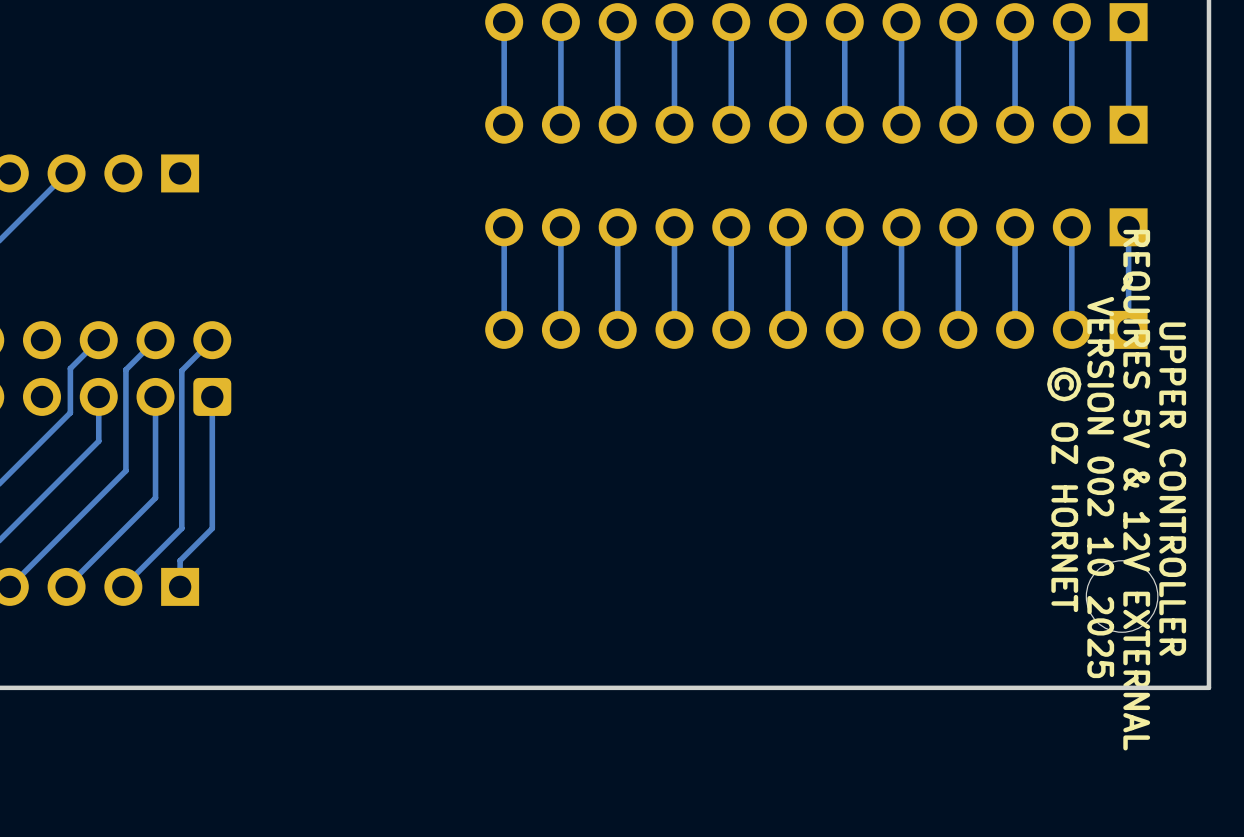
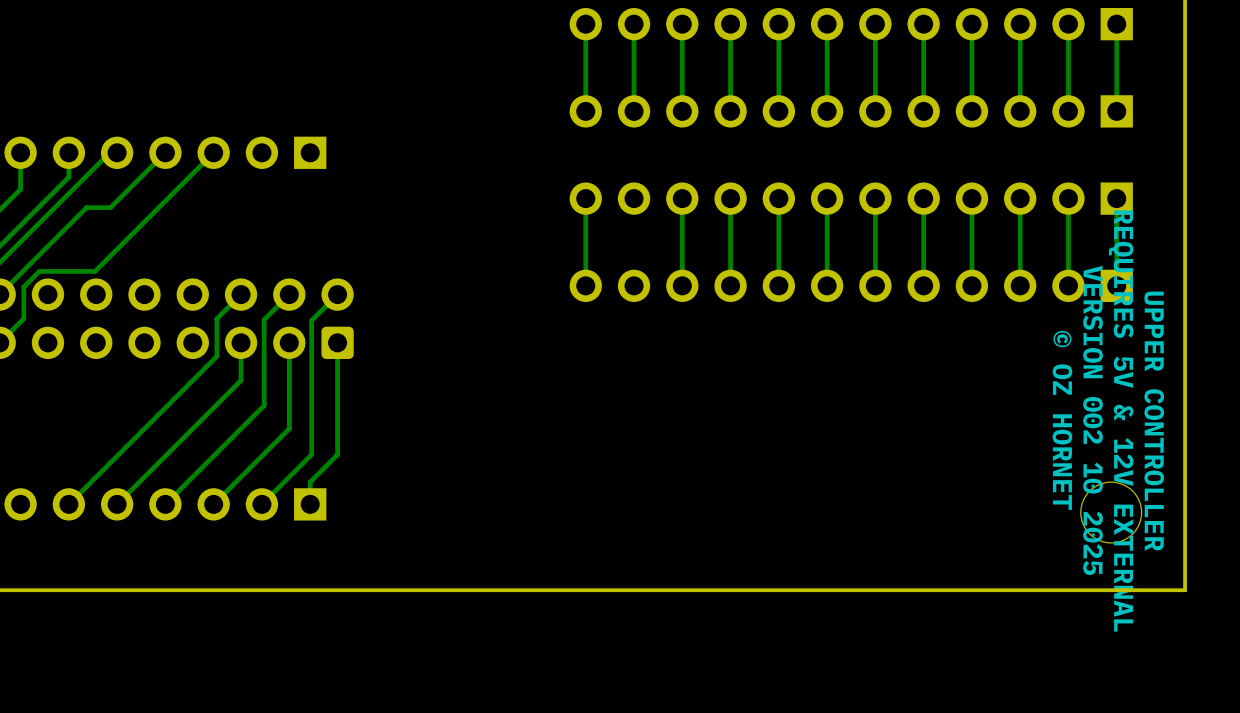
track: (560, 227) (560, 329) -> none

